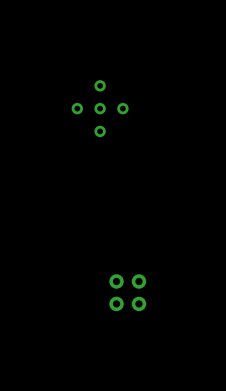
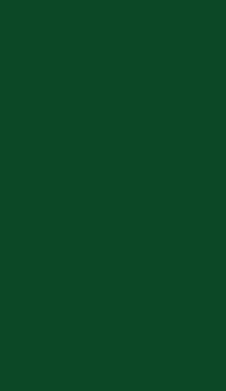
part: (100, 108) -> none
part: (127, 292) -> none

